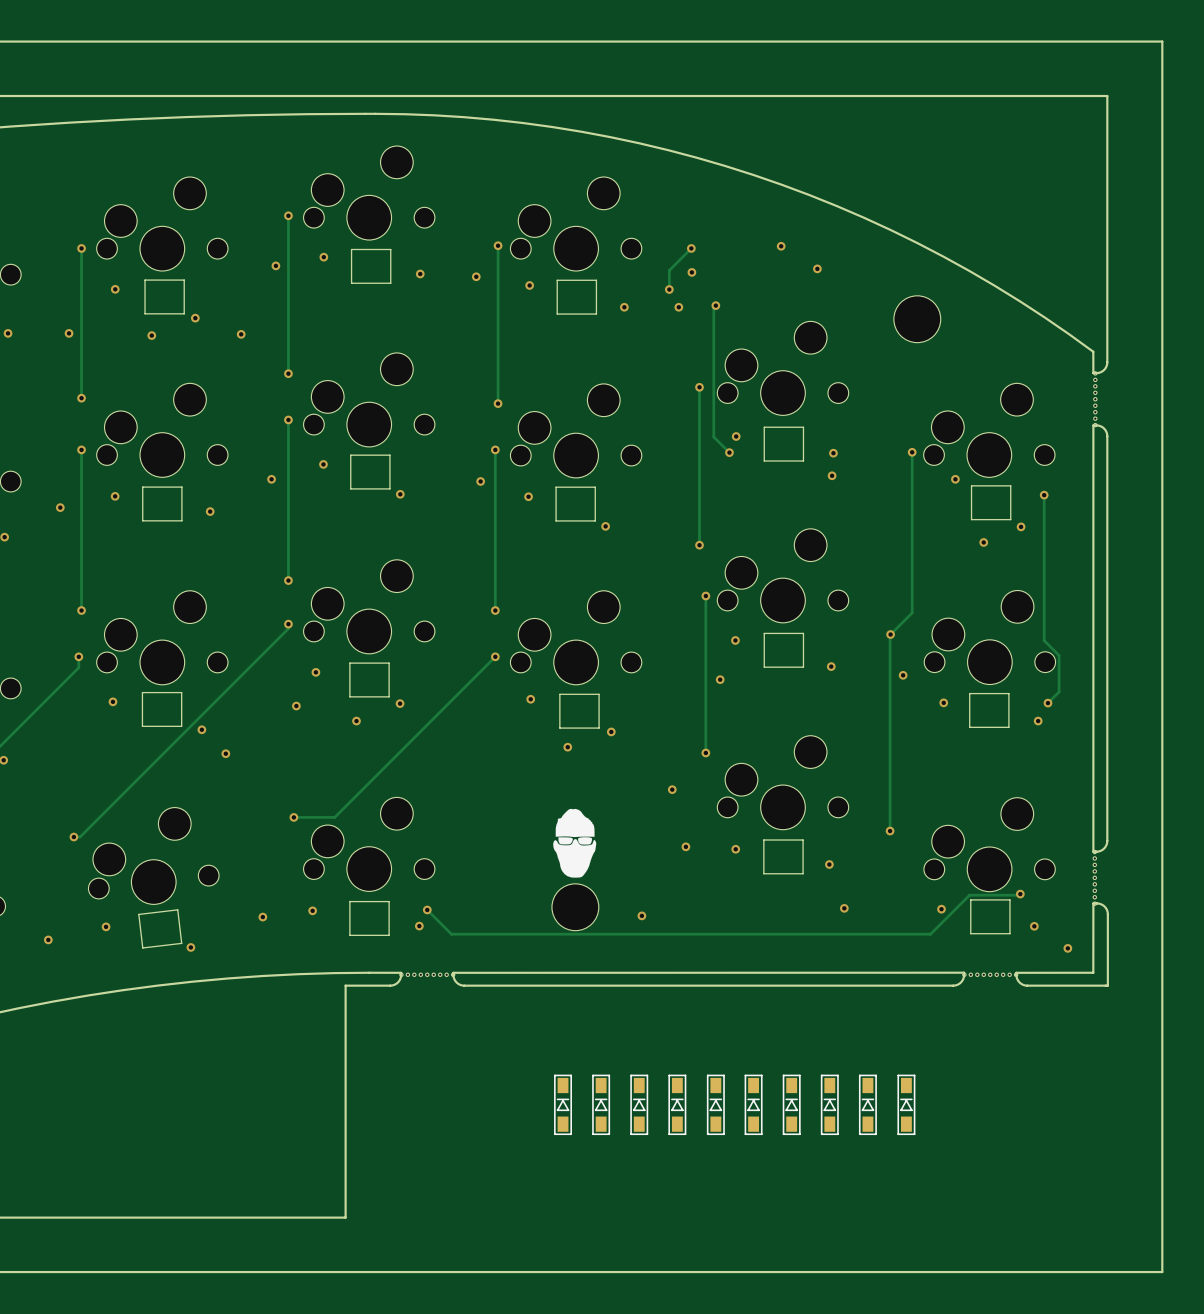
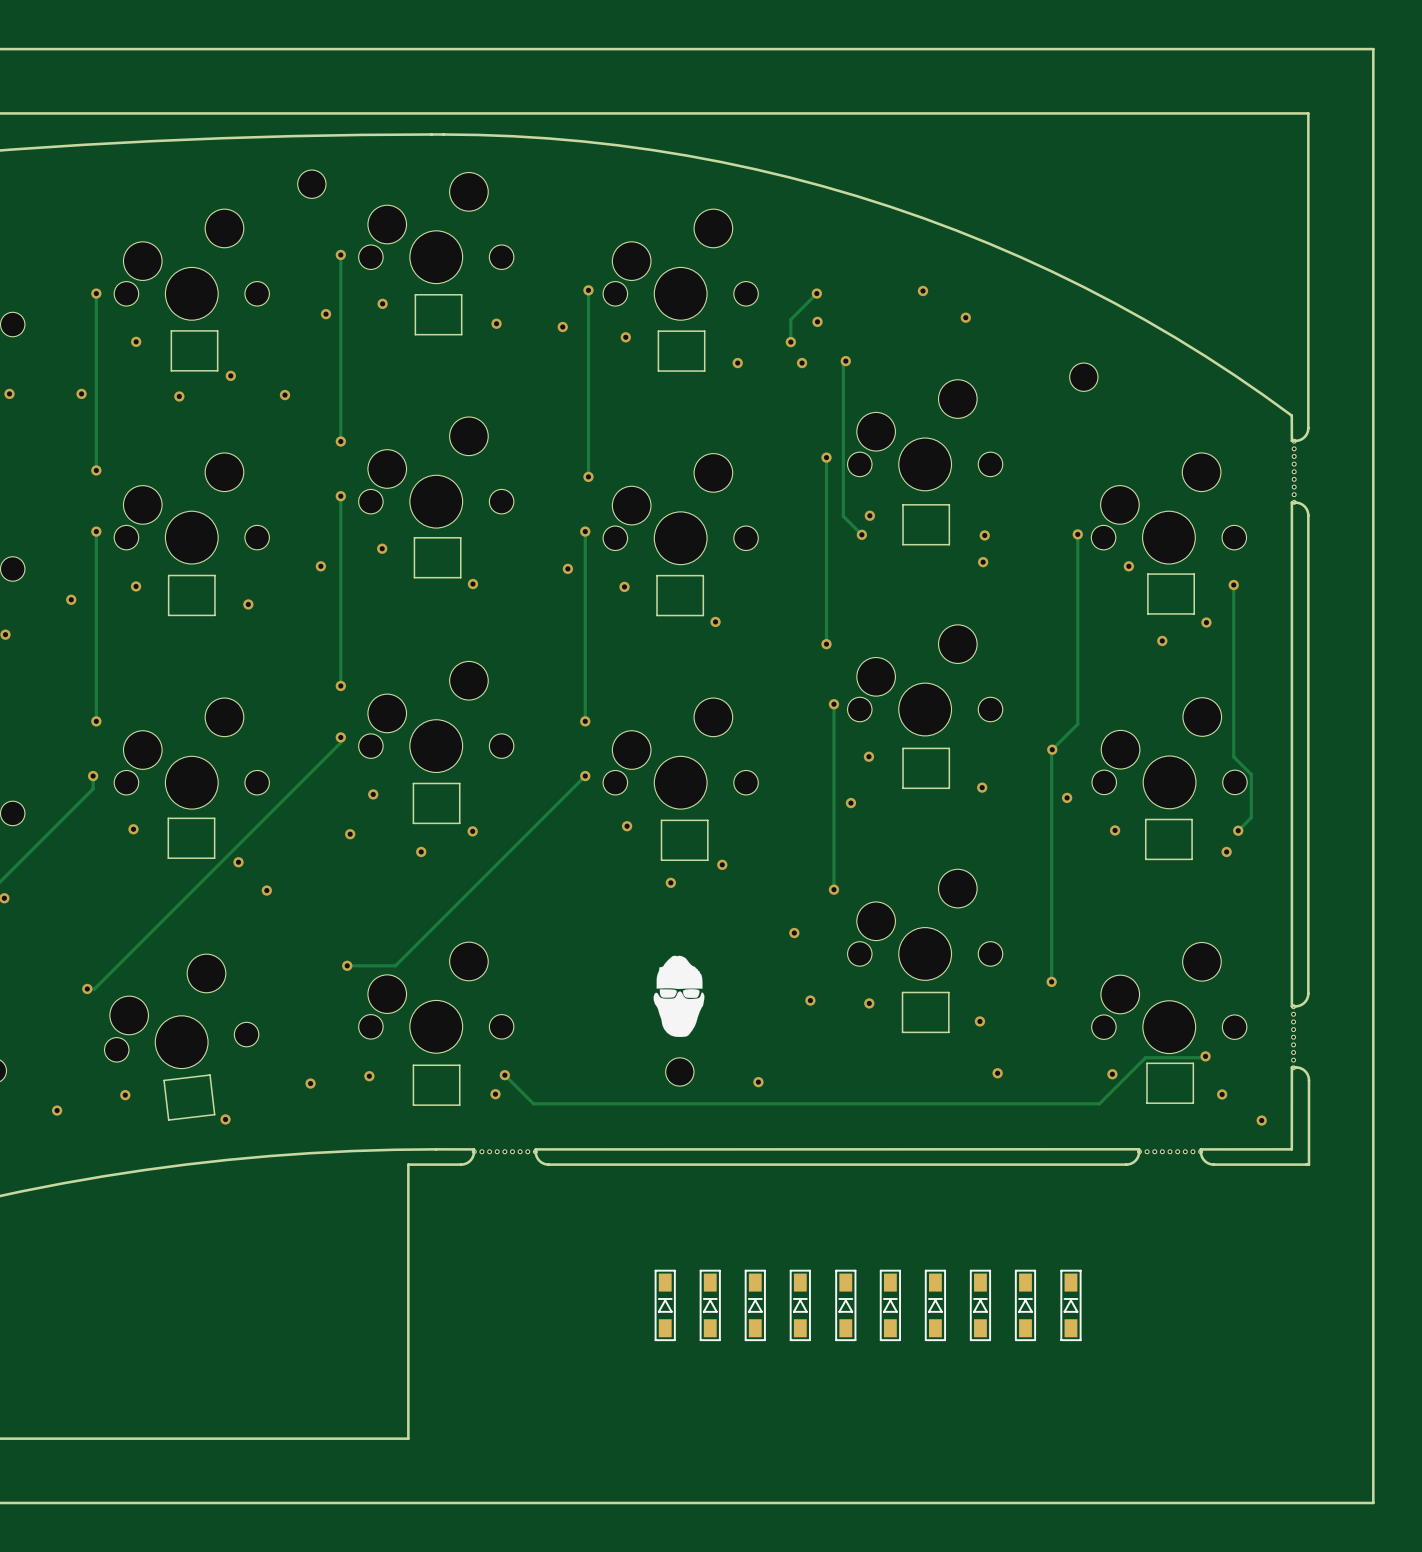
part: none -> (311, 184)
part footprint: [893, 295, 941, 343] -> [1069, 363, 1098, 392]
part footprint: [551, 883, 599, 931] -> [665, 1057, 694, 1087]

